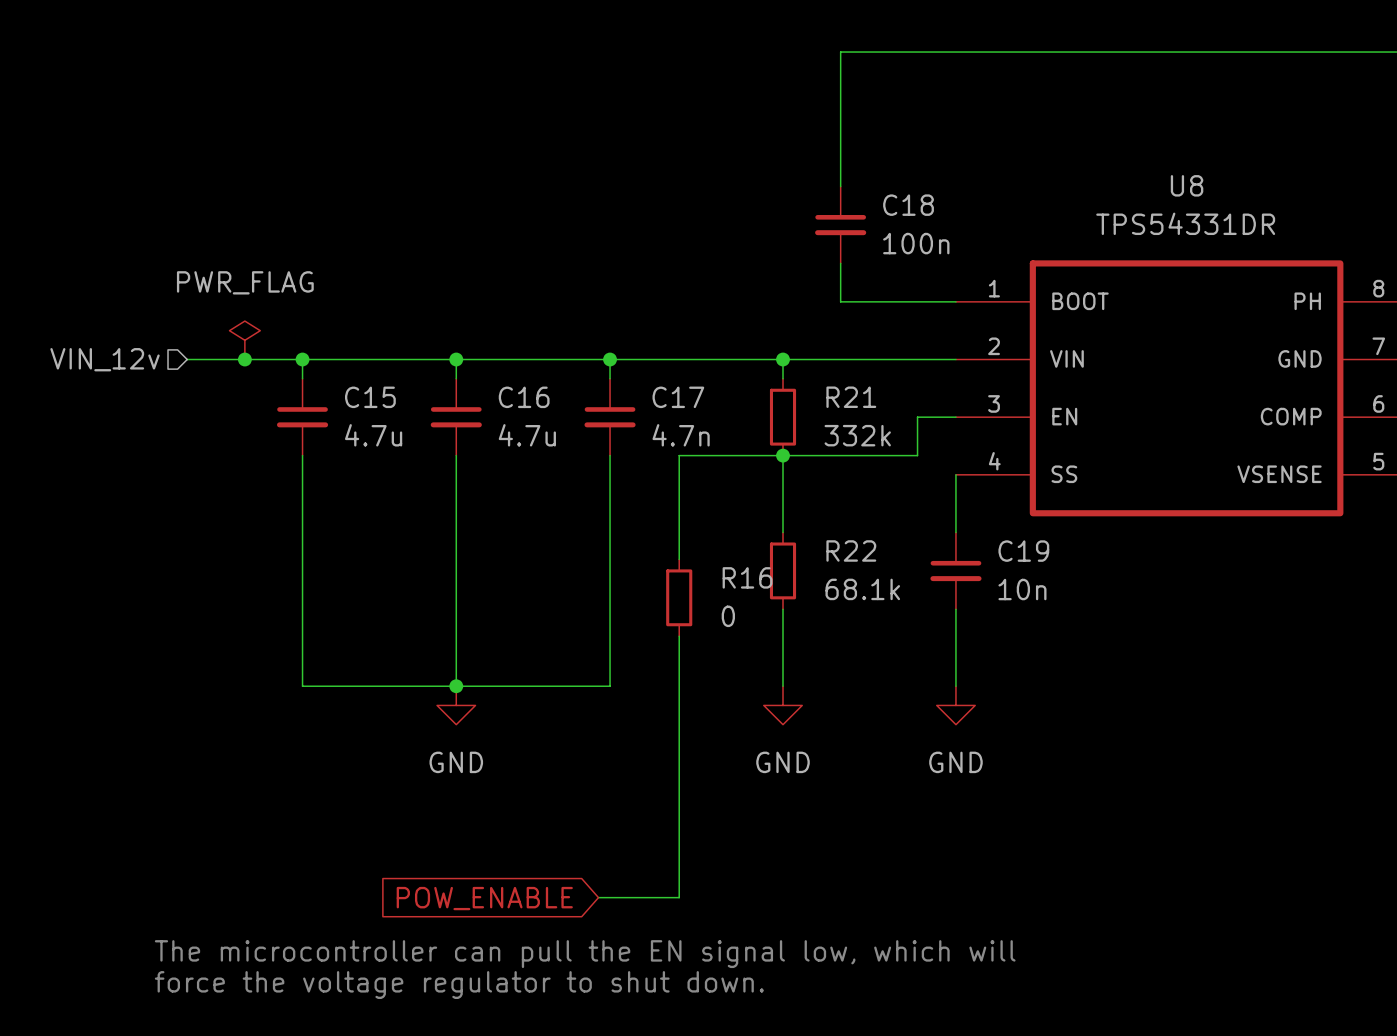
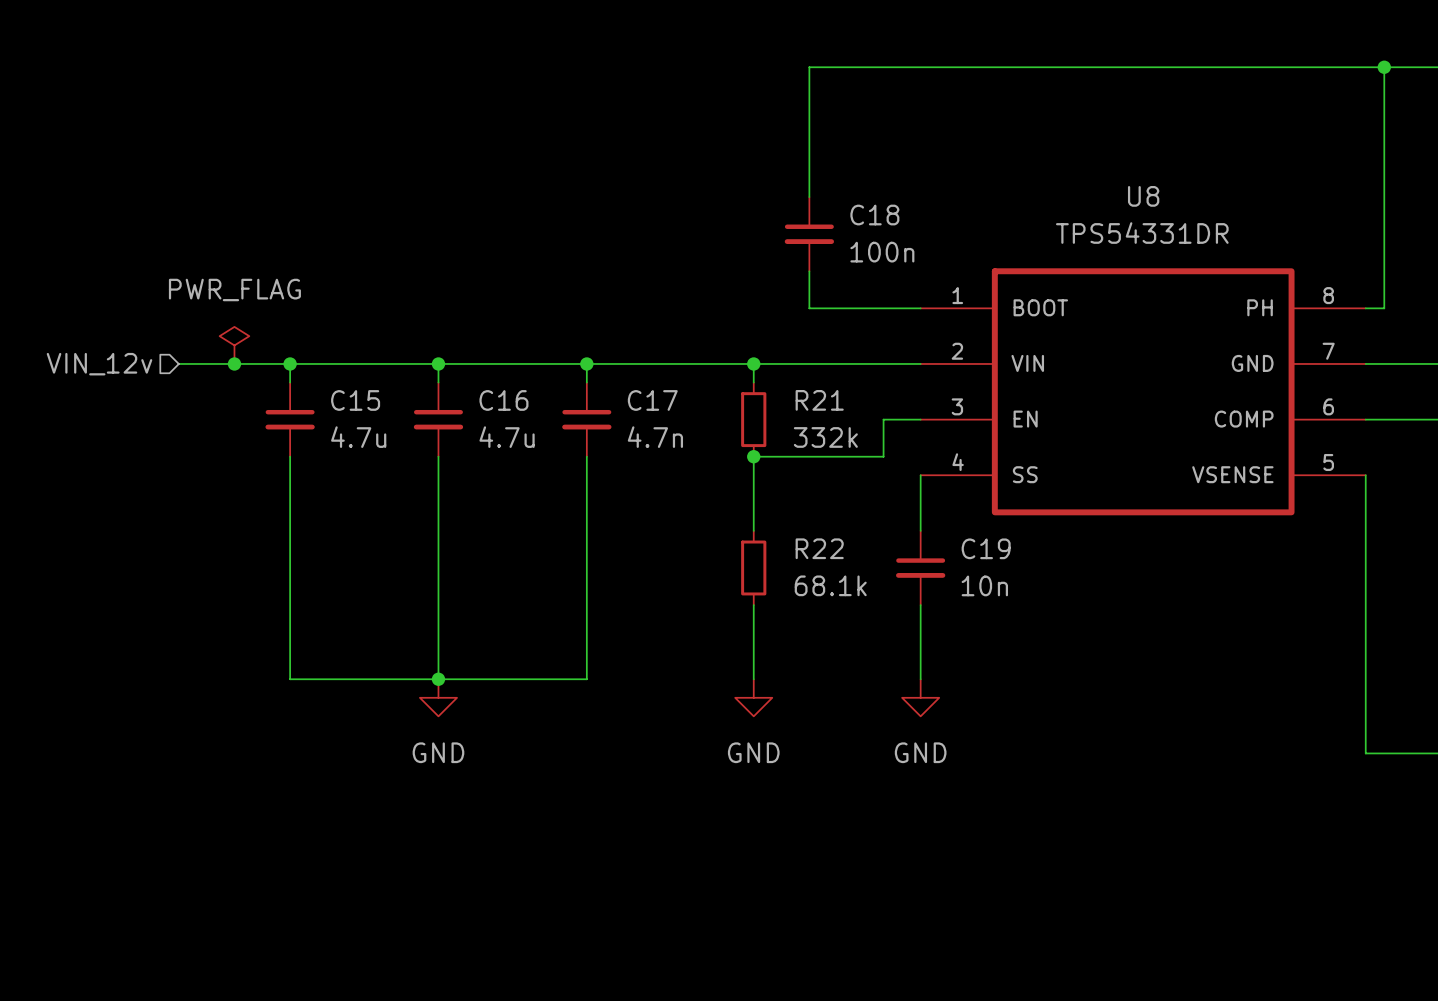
wire: (783, 455) (679, 455) (679, 559) -> none
R16: 0 (679, 597) -> none
wire: (679, 636) (679, 897) (598, 897) -> none
global label: POW_ENABLE (484, 898) -> none
text: The microcontroller can pull the EN signal low, which will (585, 954) -> none
text: force the voltage regulator to shut down. (459, 985) -> none

